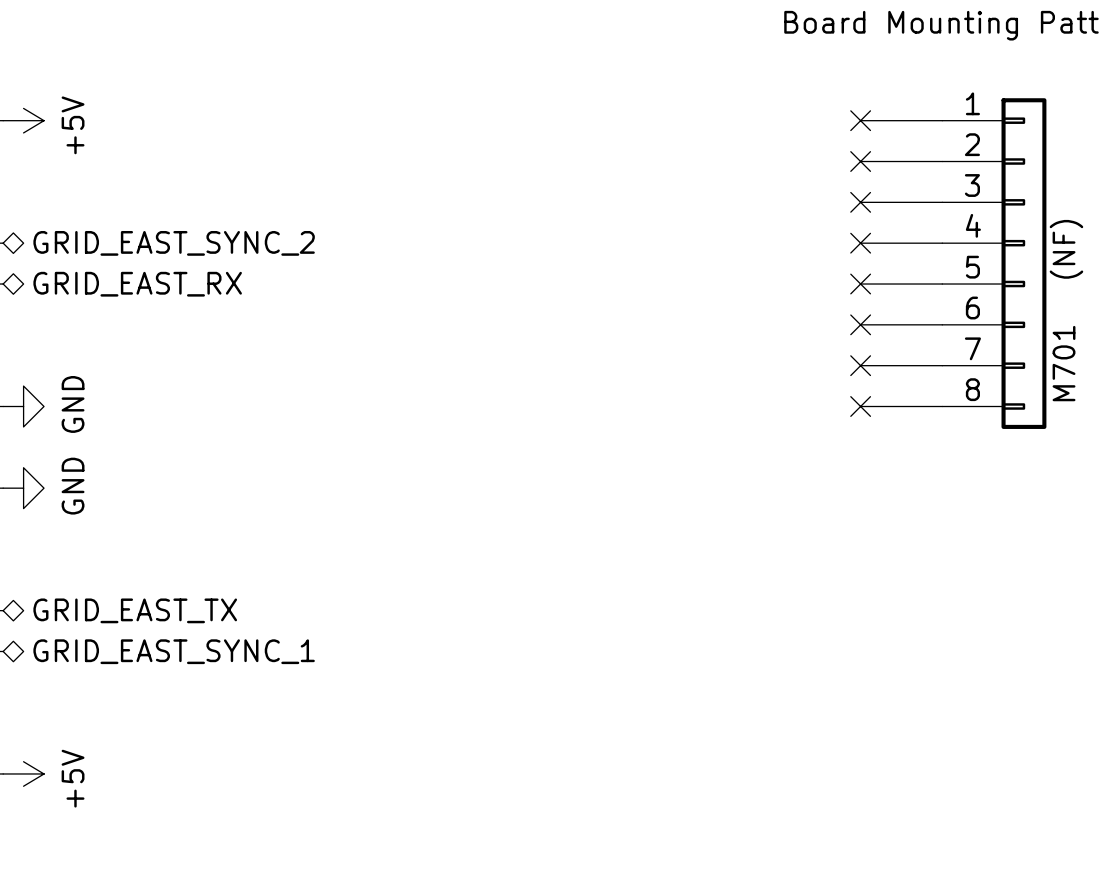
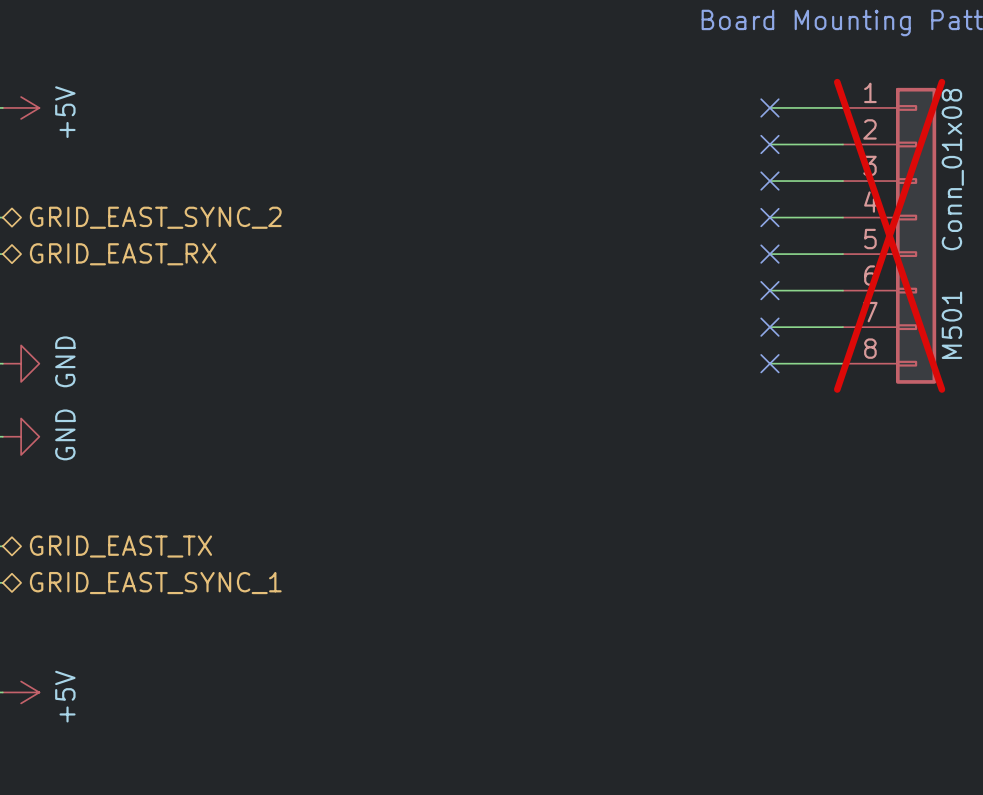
M701 value: (NF) (1066, 249) -> Conn_01x08 (952, 169)
M701 do-not-place cross: none -> (889, 235)
M701 name: M701 (1064, 363) -> M501 (951, 325)

